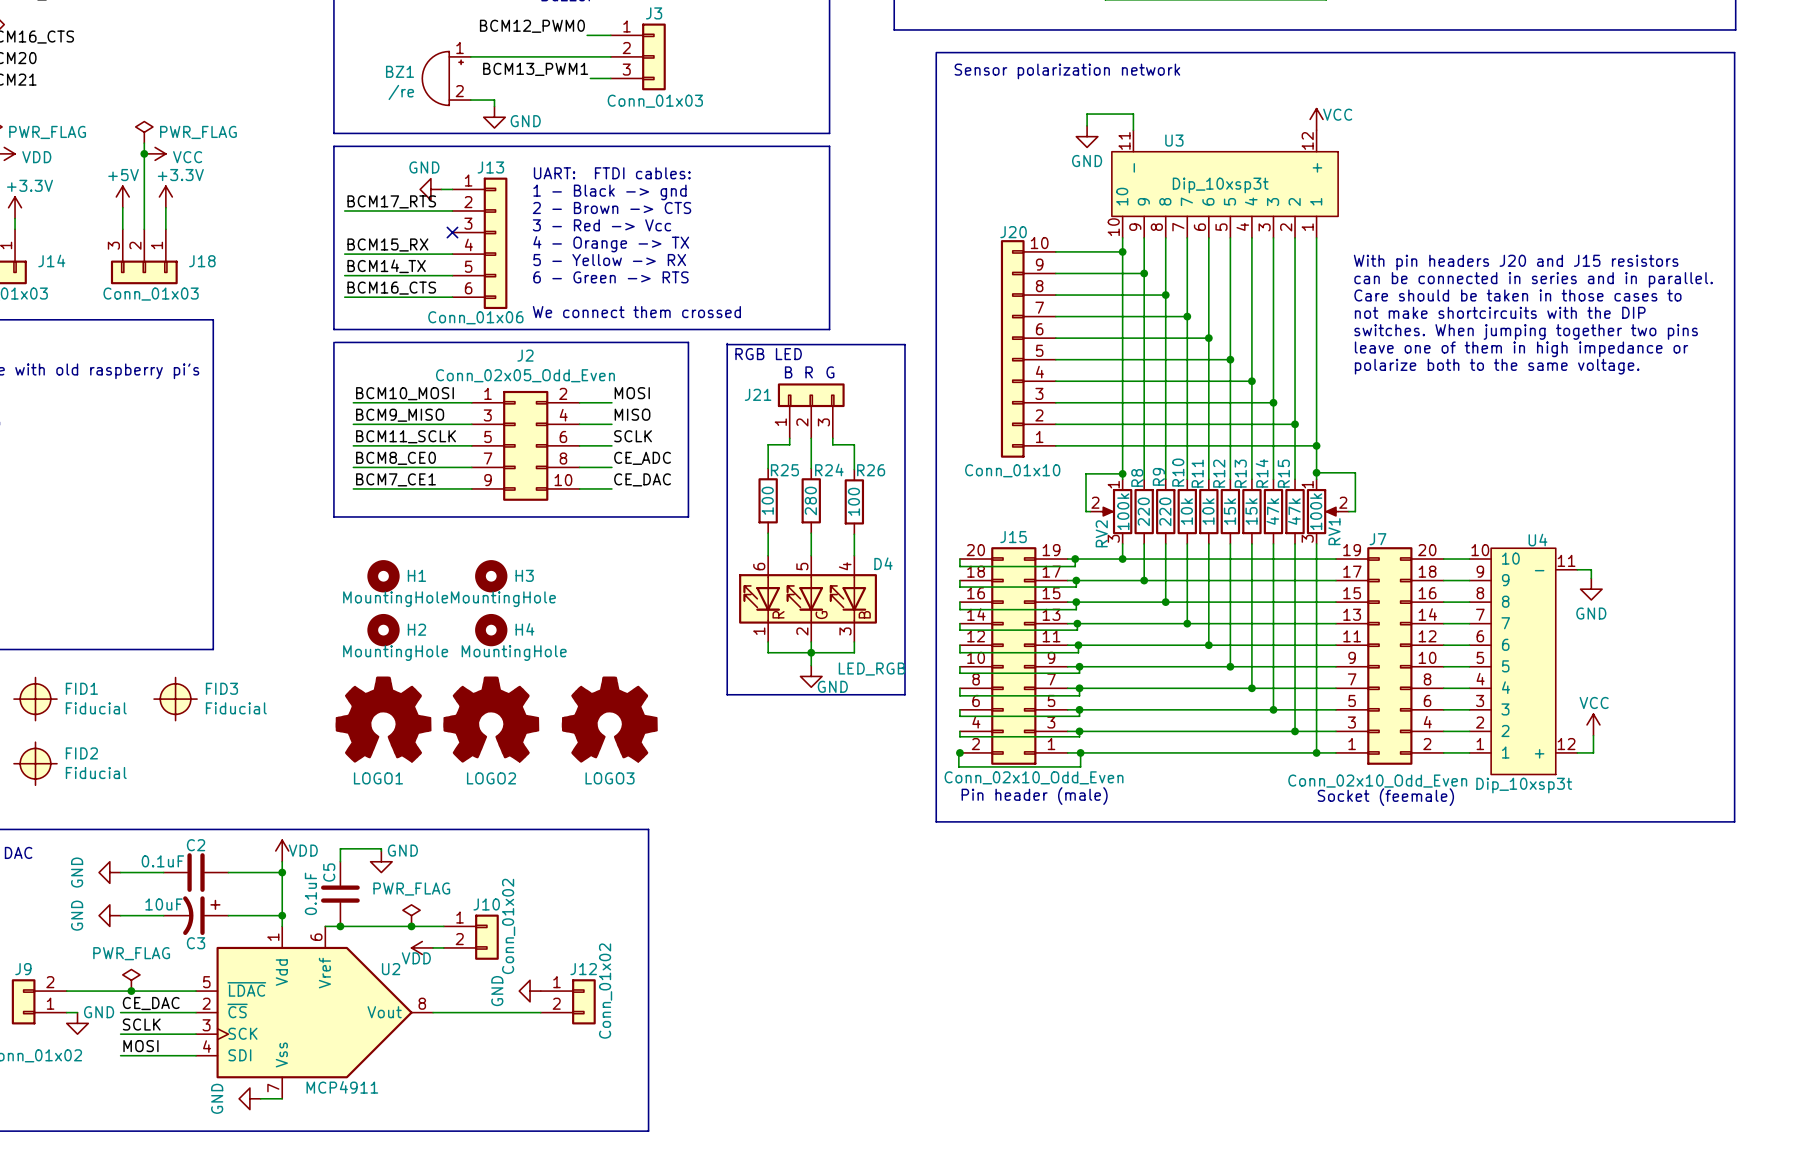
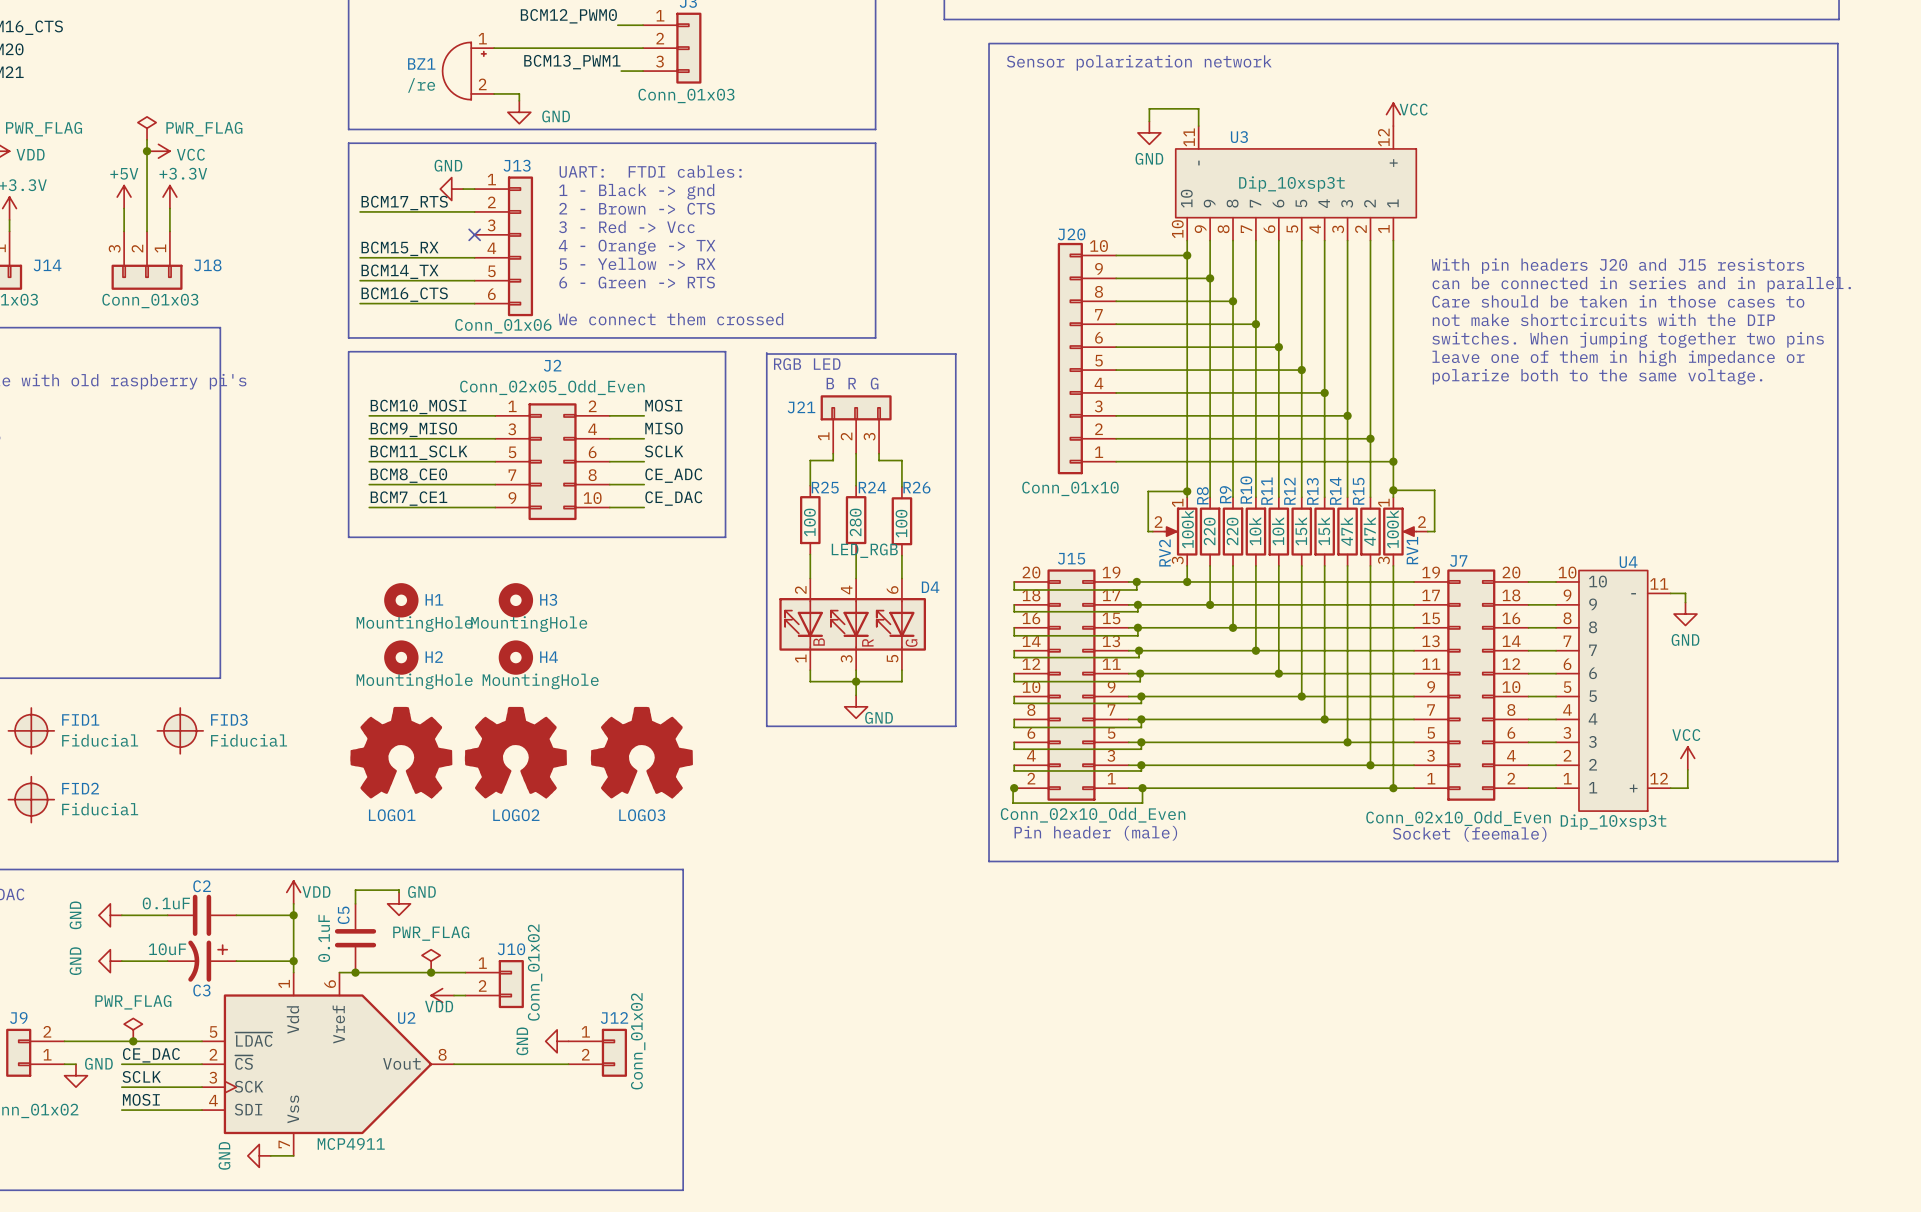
D4 pin number: 6 (759, 566) -> 2 (800, 589)
D4 pin number: 5 (802, 566) -> 4 (846, 590)
D4 pin number: 4 (845, 566) -> 6 (892, 589)
D4 text position: R (778, 614) -> R (867, 642)
D4 text position: B (864, 614) -> B (819, 641)
D4 text position: G (821, 615) -> G (911, 643)
D4 pin number: 2 (802, 631) -> 3 (846, 659)
D4 pin number: 3 (845, 631) -> 5 (892, 658)
D4 value position: LED_RGB (872, 669) -> LED_RGB (864, 550)

